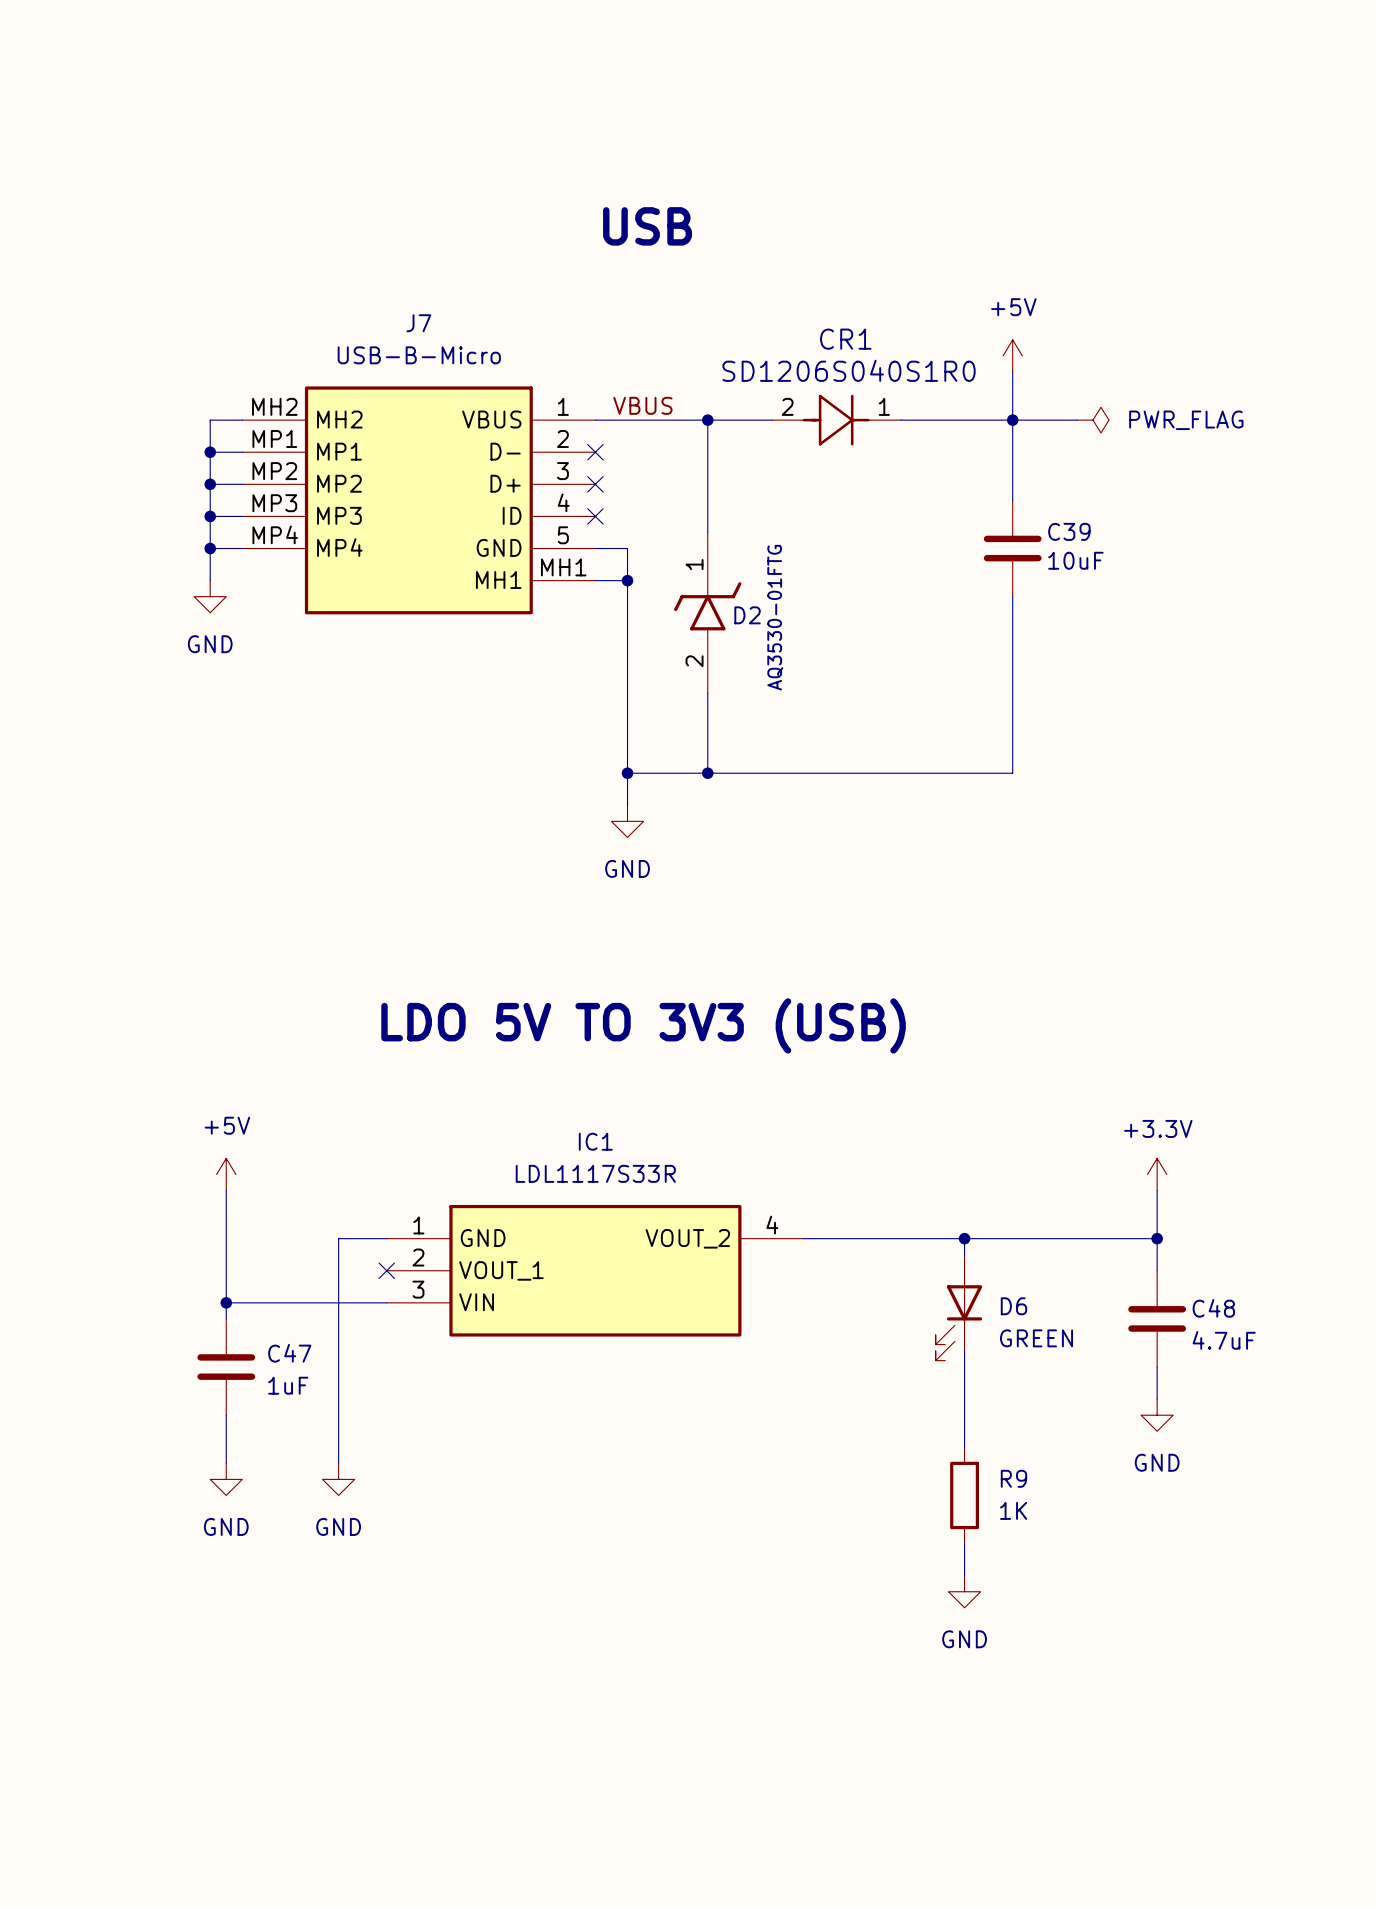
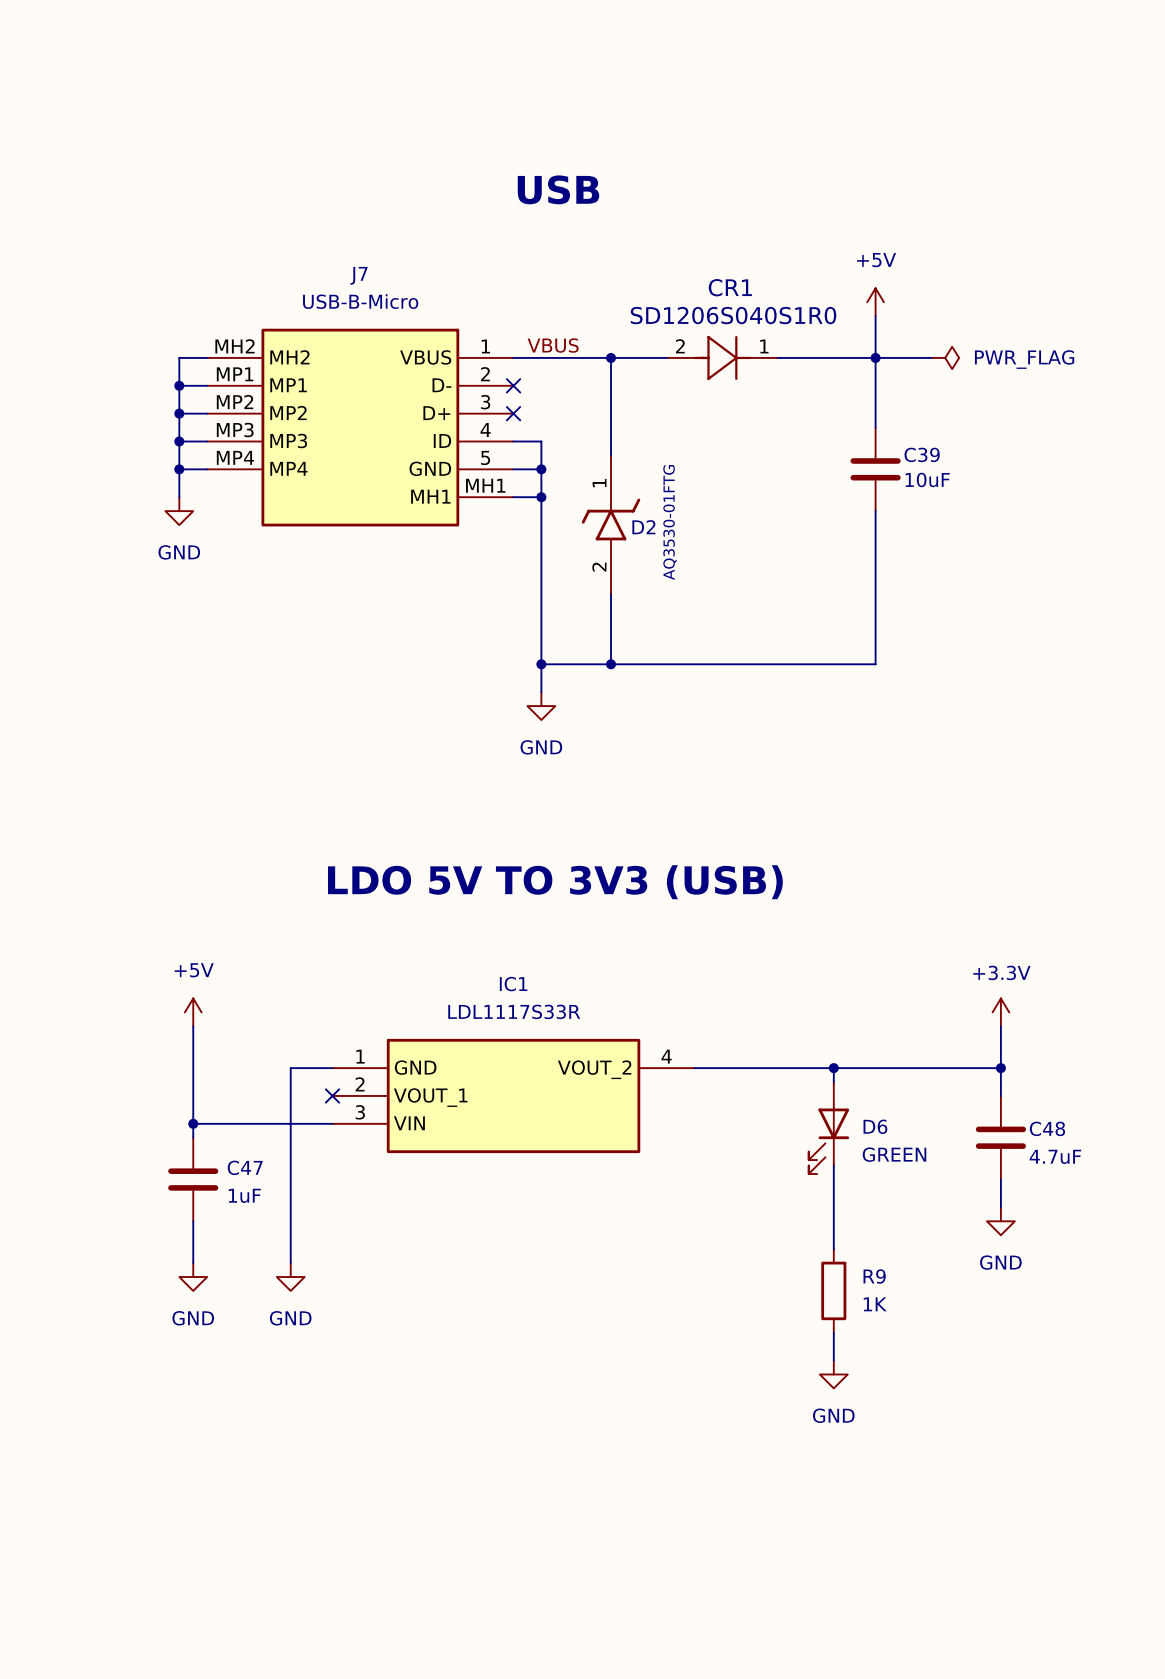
wire: none -> (513, 441) (541, 441) (541, 469)
no-connect mark: (595, 516) -> none
junction: none -> (541, 469)

